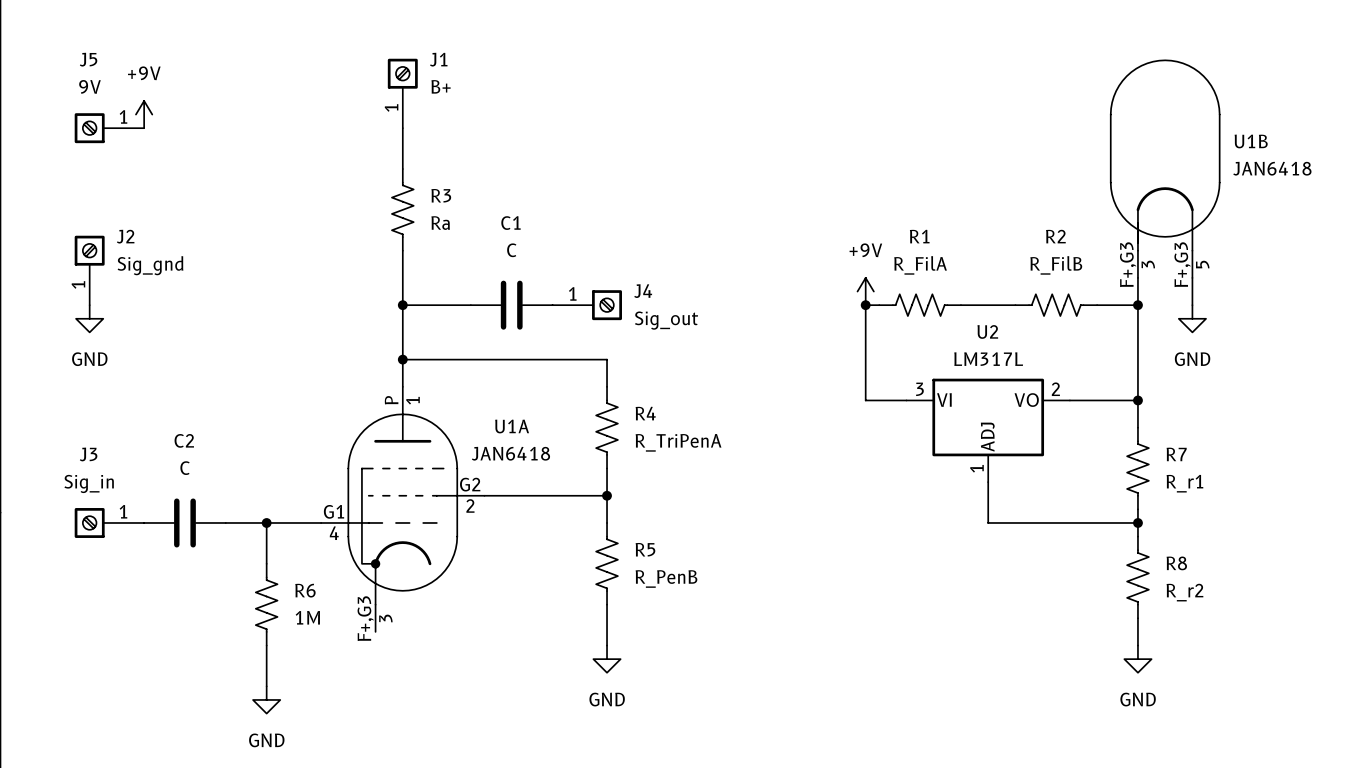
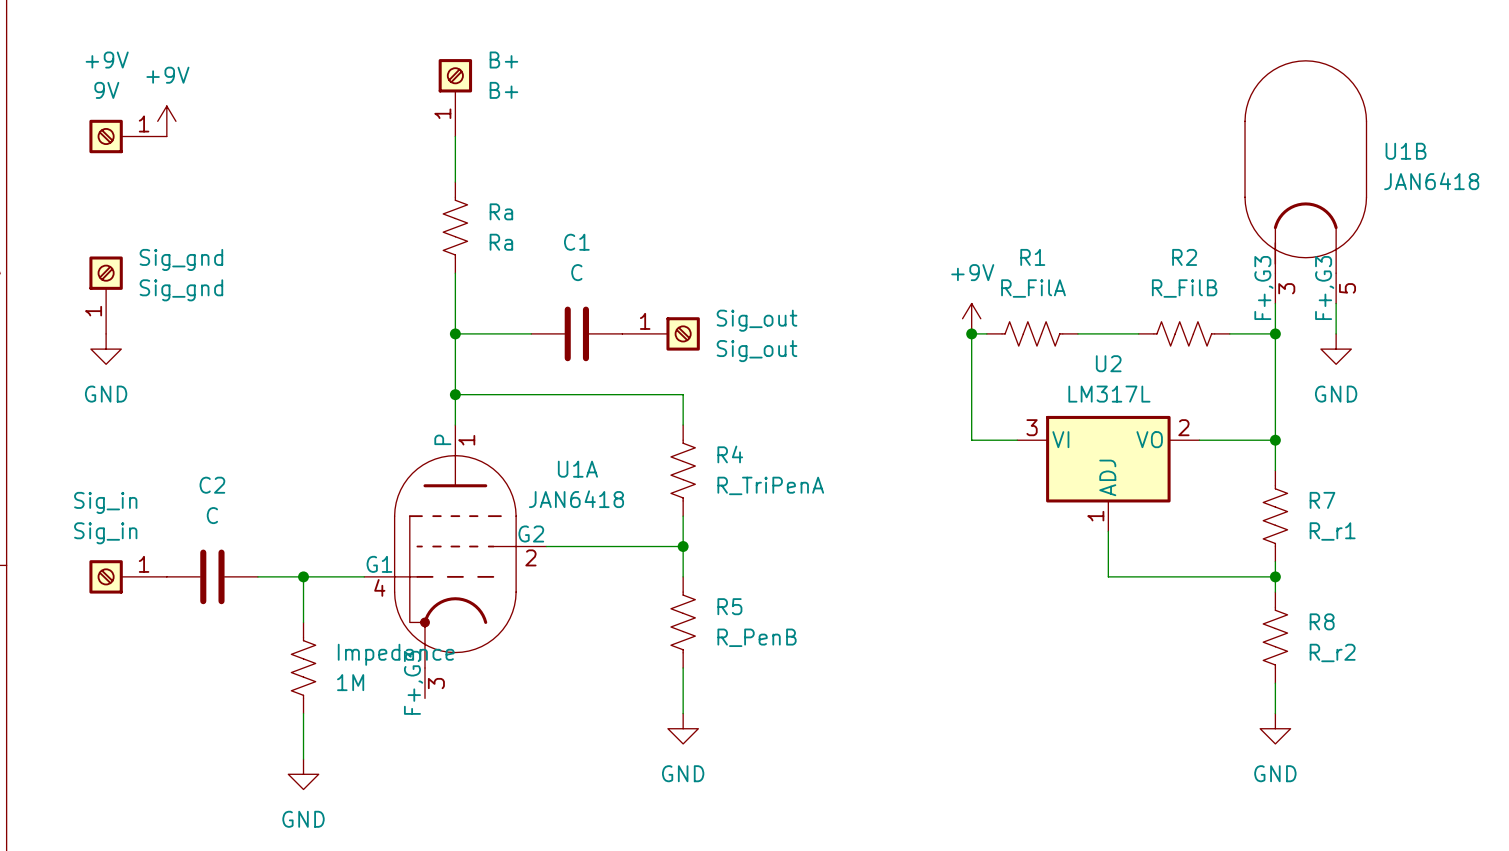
J5 name: J5 (88, 59) -> +9V (107, 60)
J1 name: J1 (438, 59) -> B+ (503, 60)
R3 name: R3 (441, 195) -> Ra (501, 211)
J2 name: J2 (125, 236) -> Sig_gnd (181, 259)
J4 name: J4 (643, 291) -> Sig_out (757, 320)
J3 name: J3 (88, 454) -> Sig_in (105, 502)
R6 name: R6 (305, 590) -> Impedance (396, 654)

